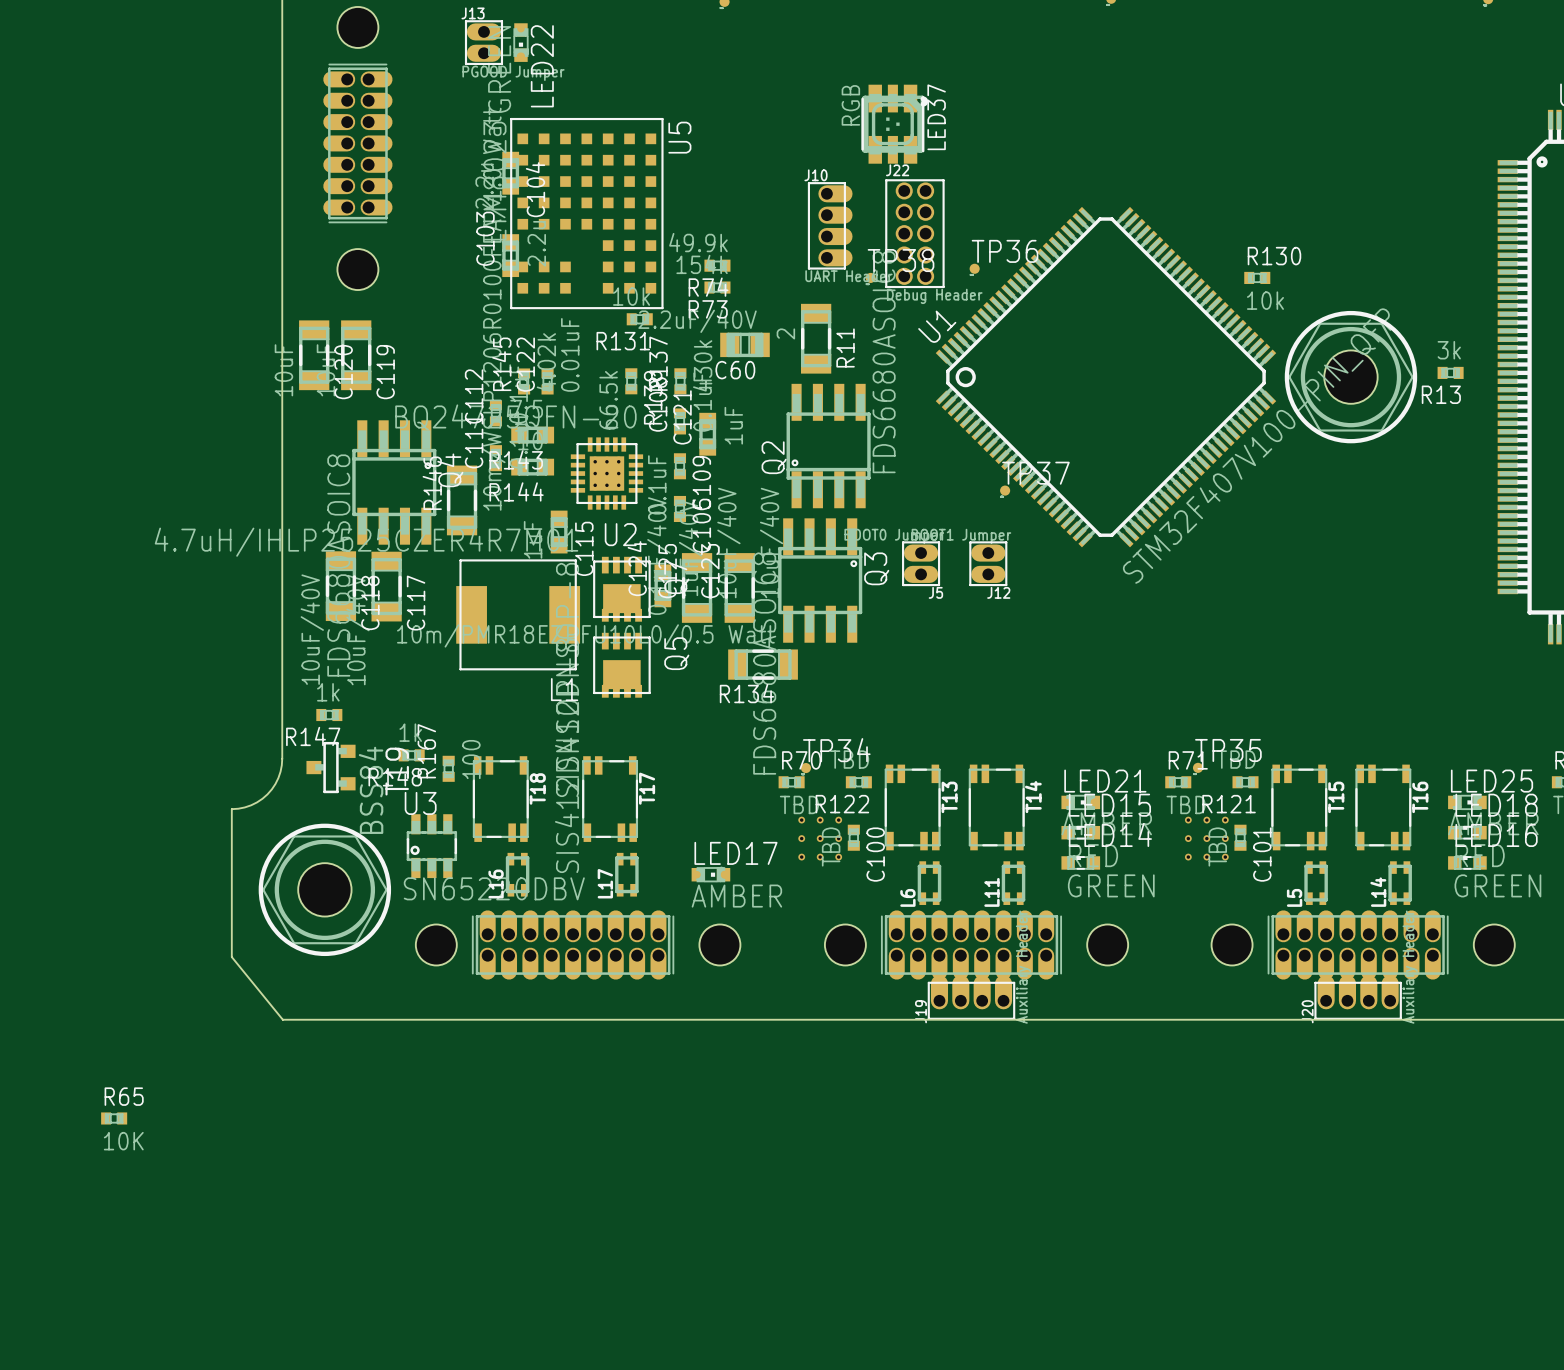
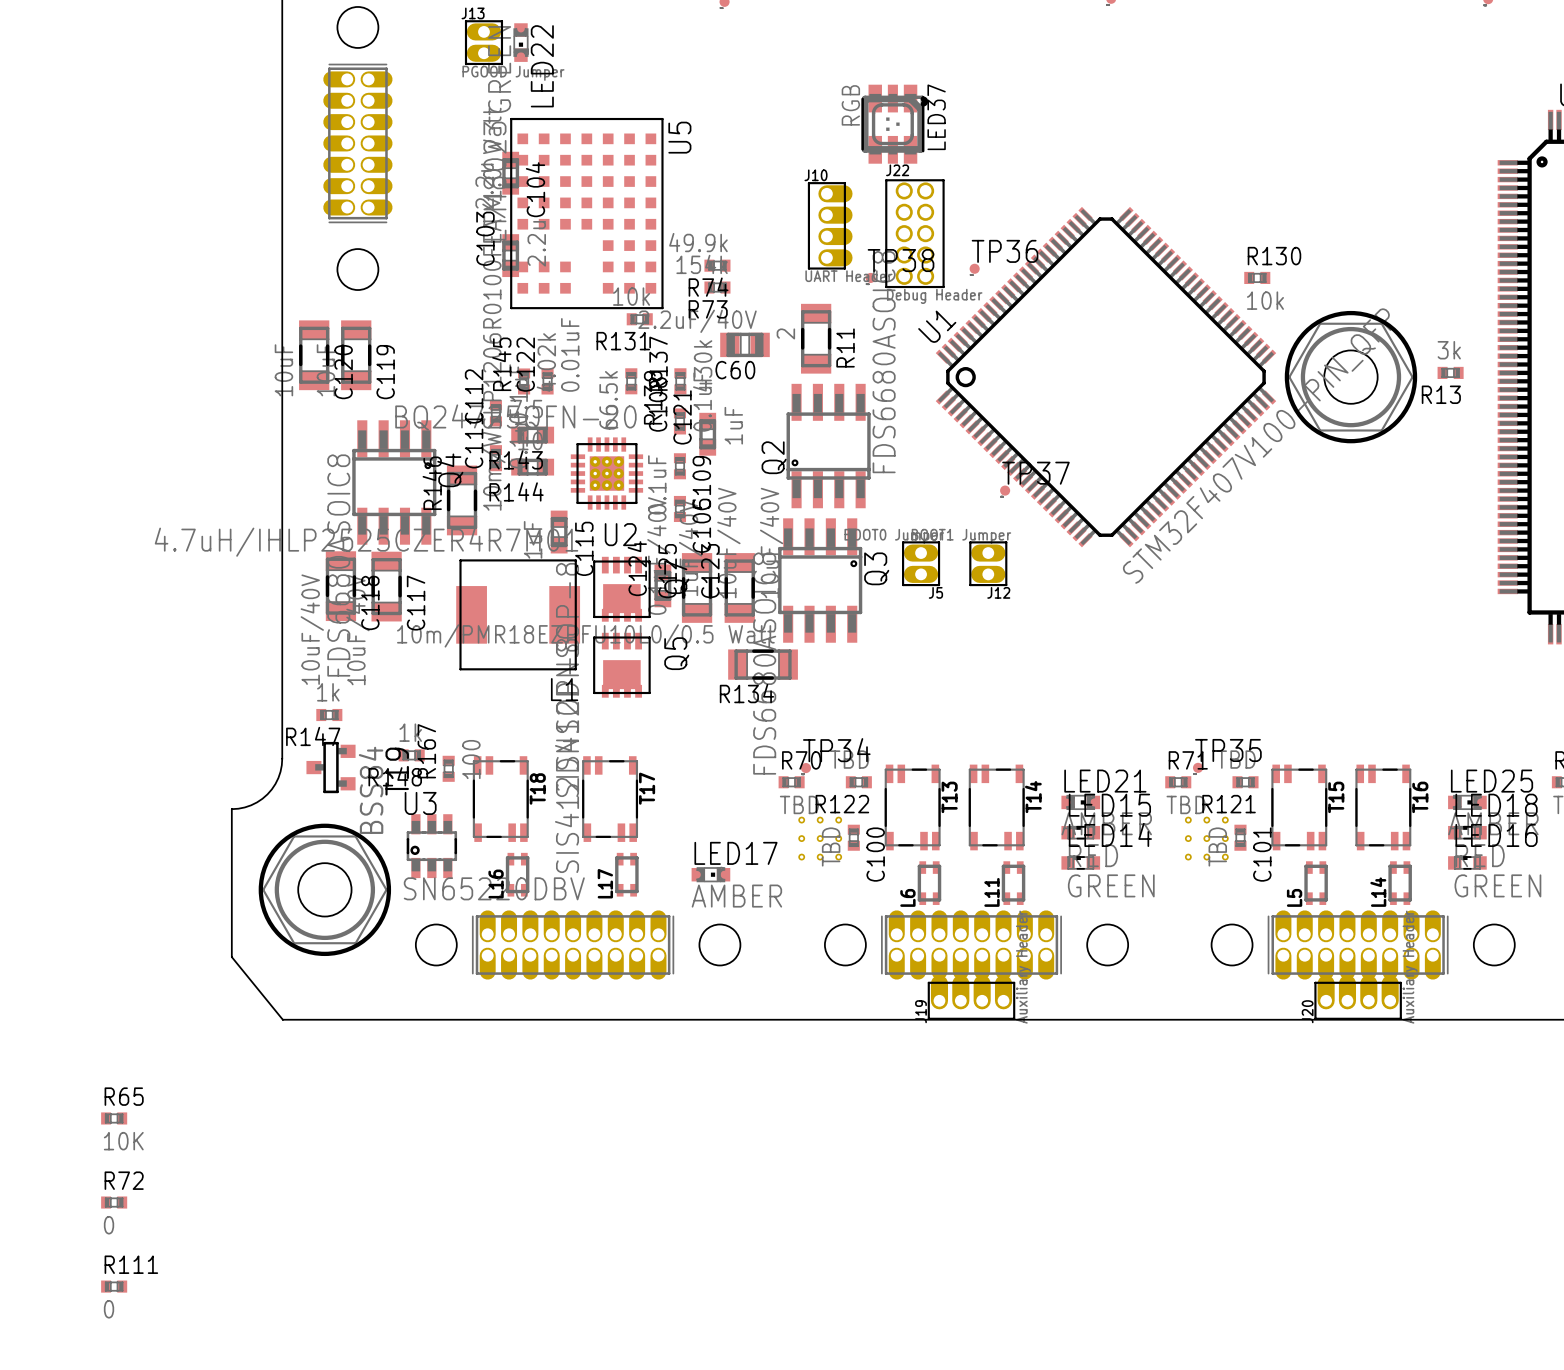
R72: none -> 0 (114, 1202)
R111: none -> 0 (114, 1286)

